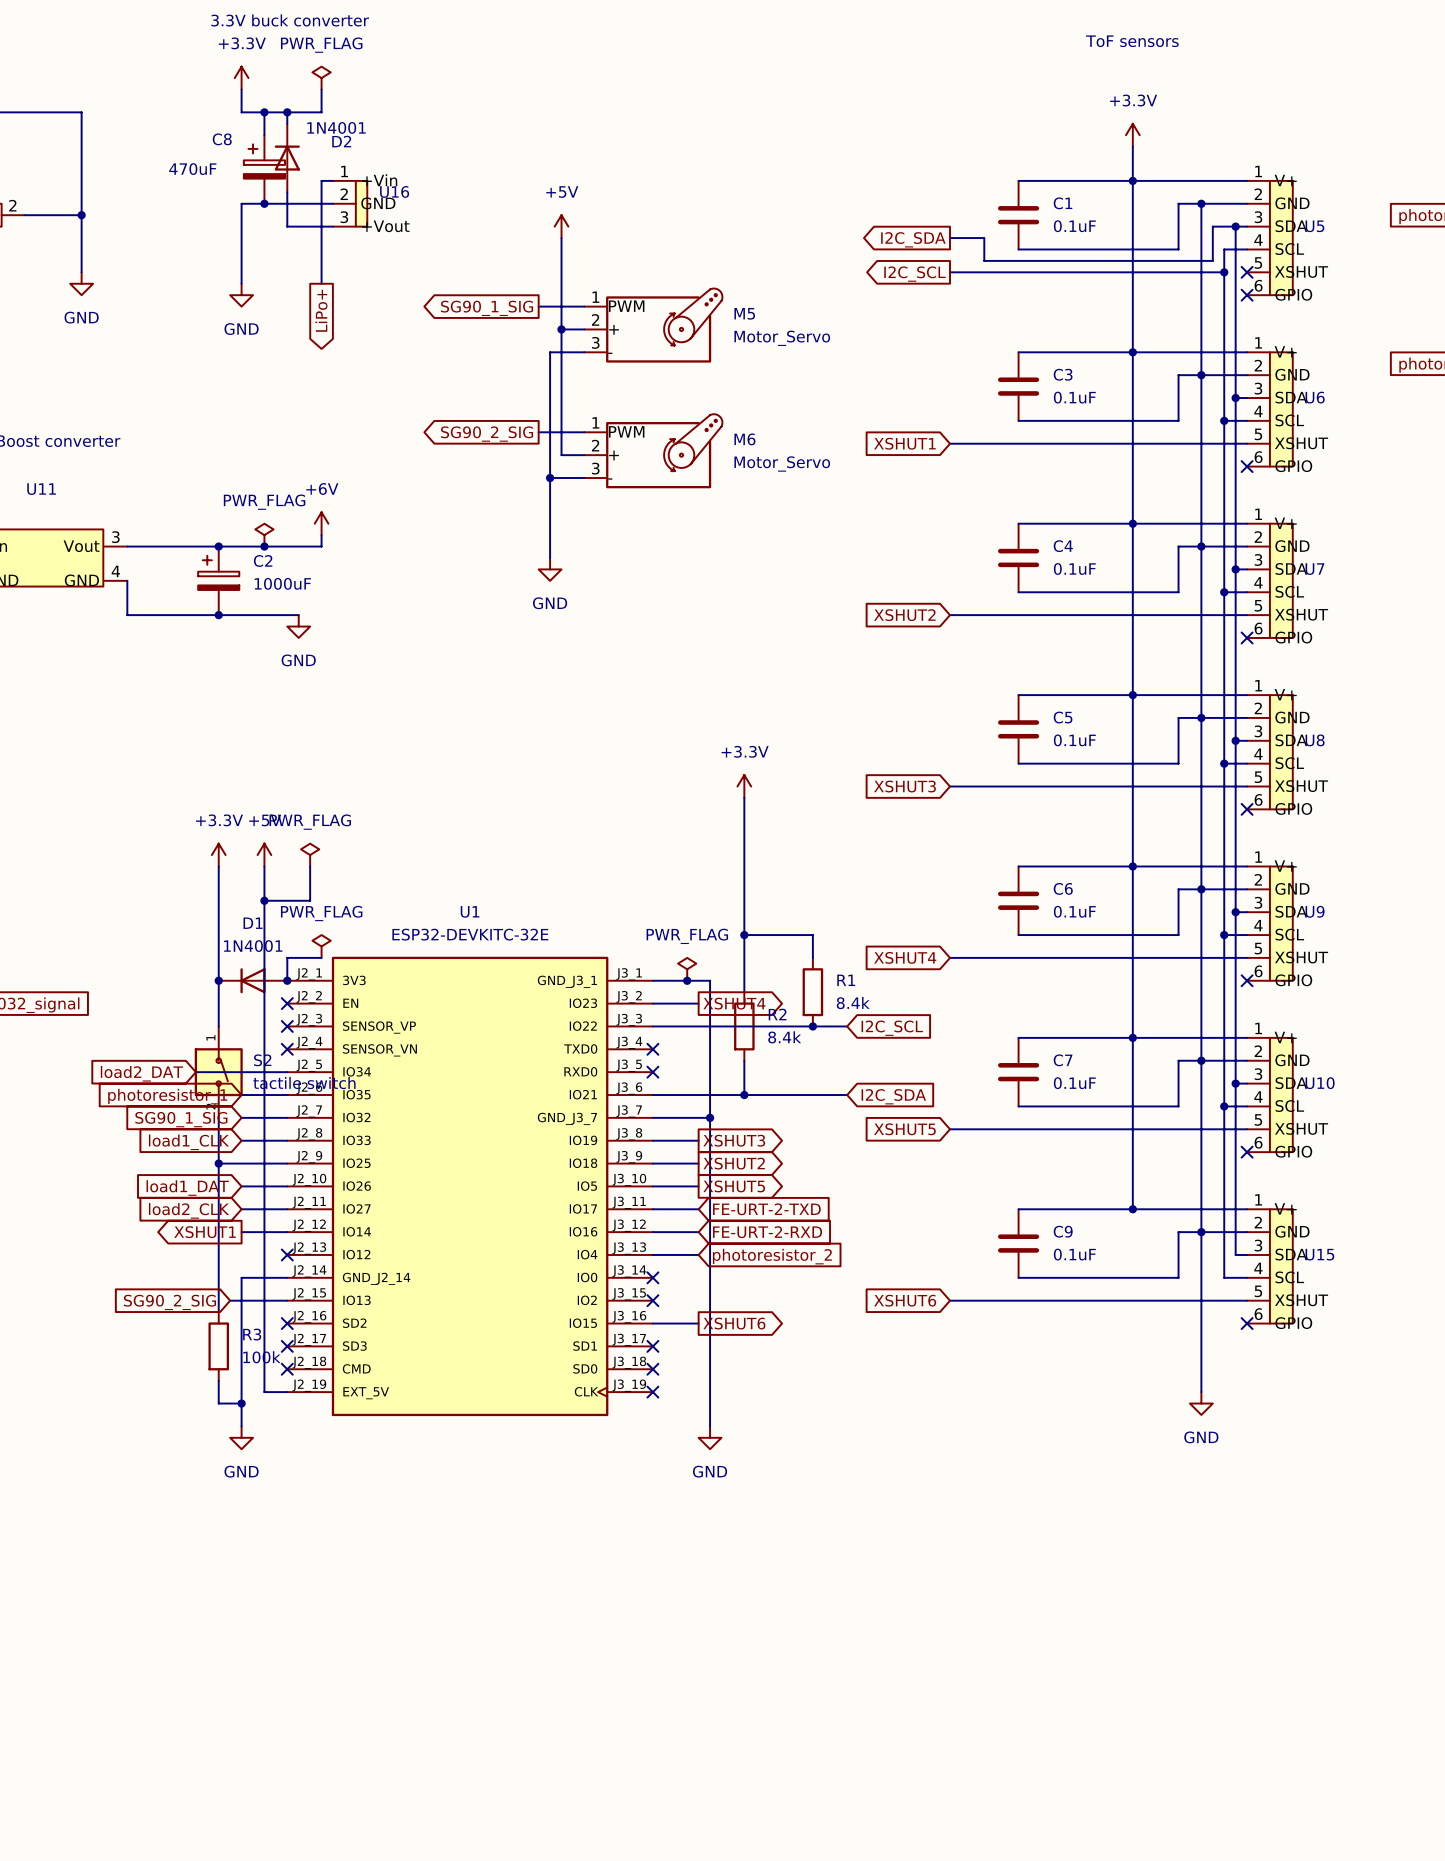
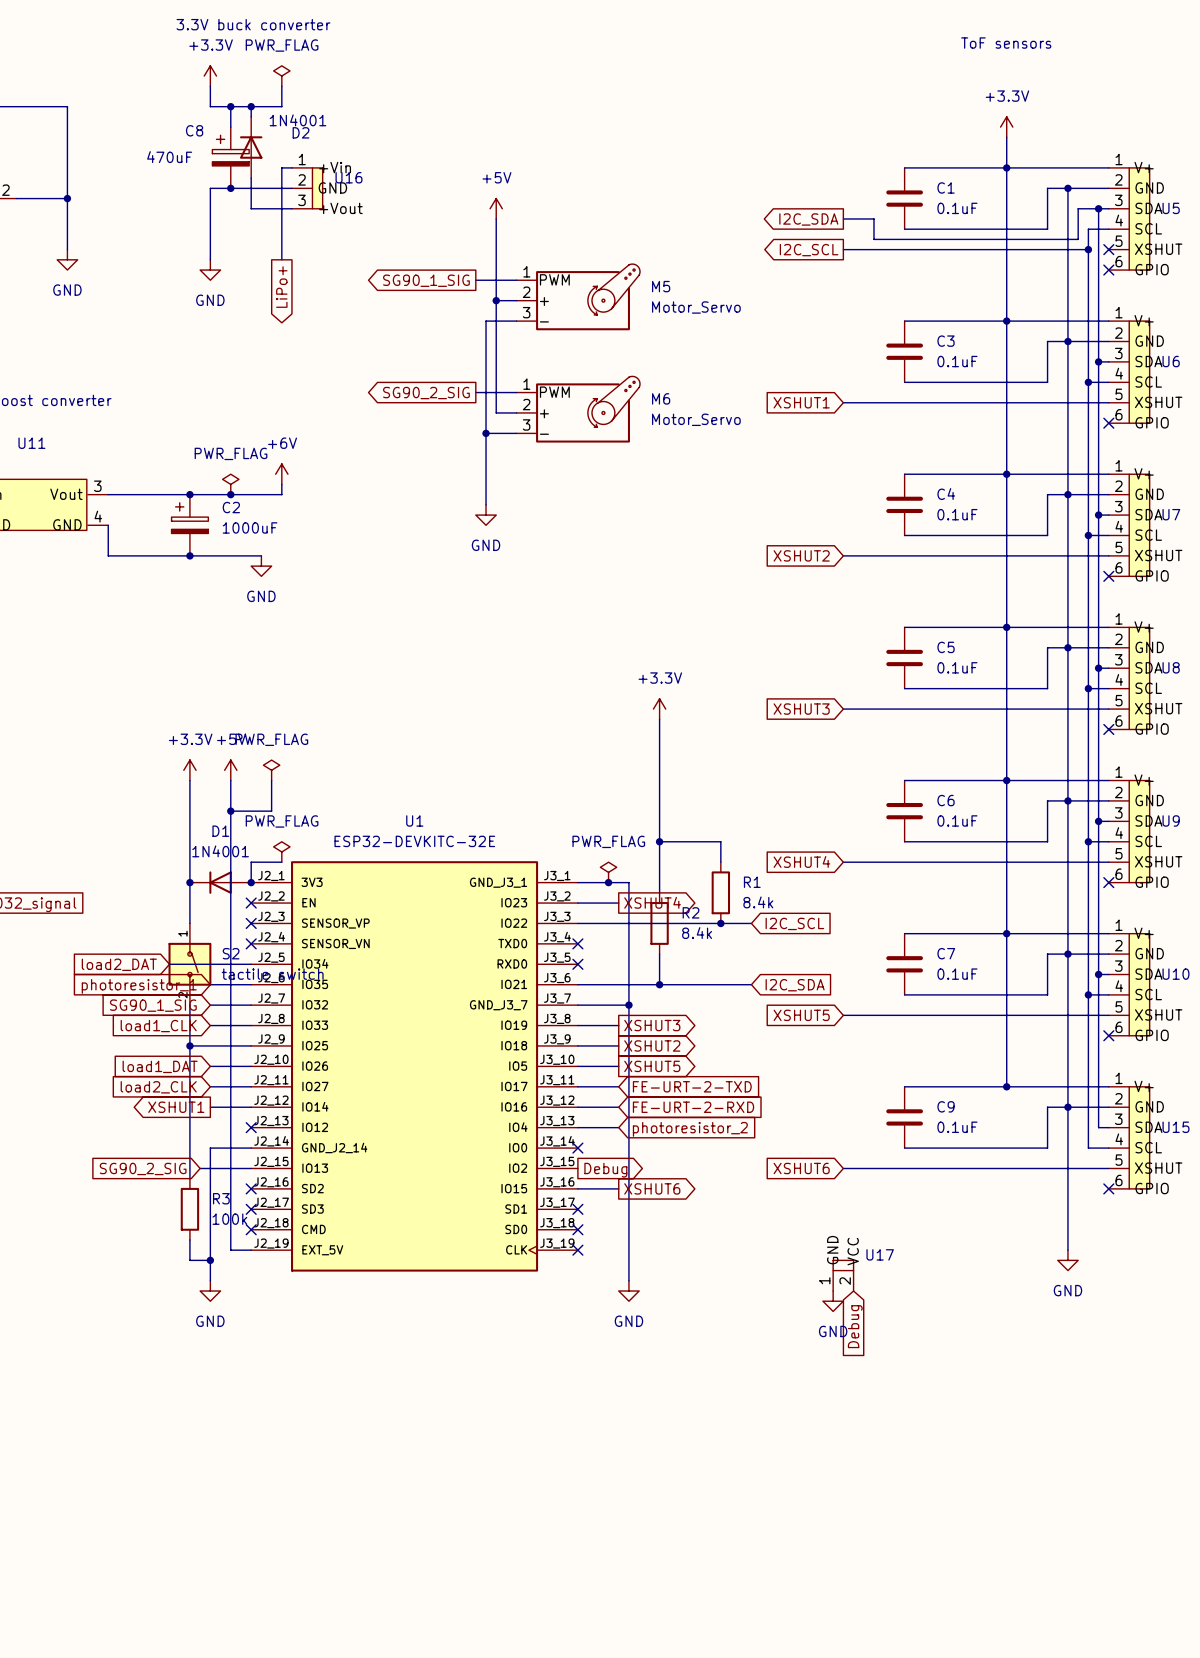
no-connect mark: (652, 1300) -> none
global label: none -> Debug (605, 1170)
U17: none -> (843, 1275)
power symbol: none -> GND (833, 1301)
global label: none -> Debug (855, 1326)

